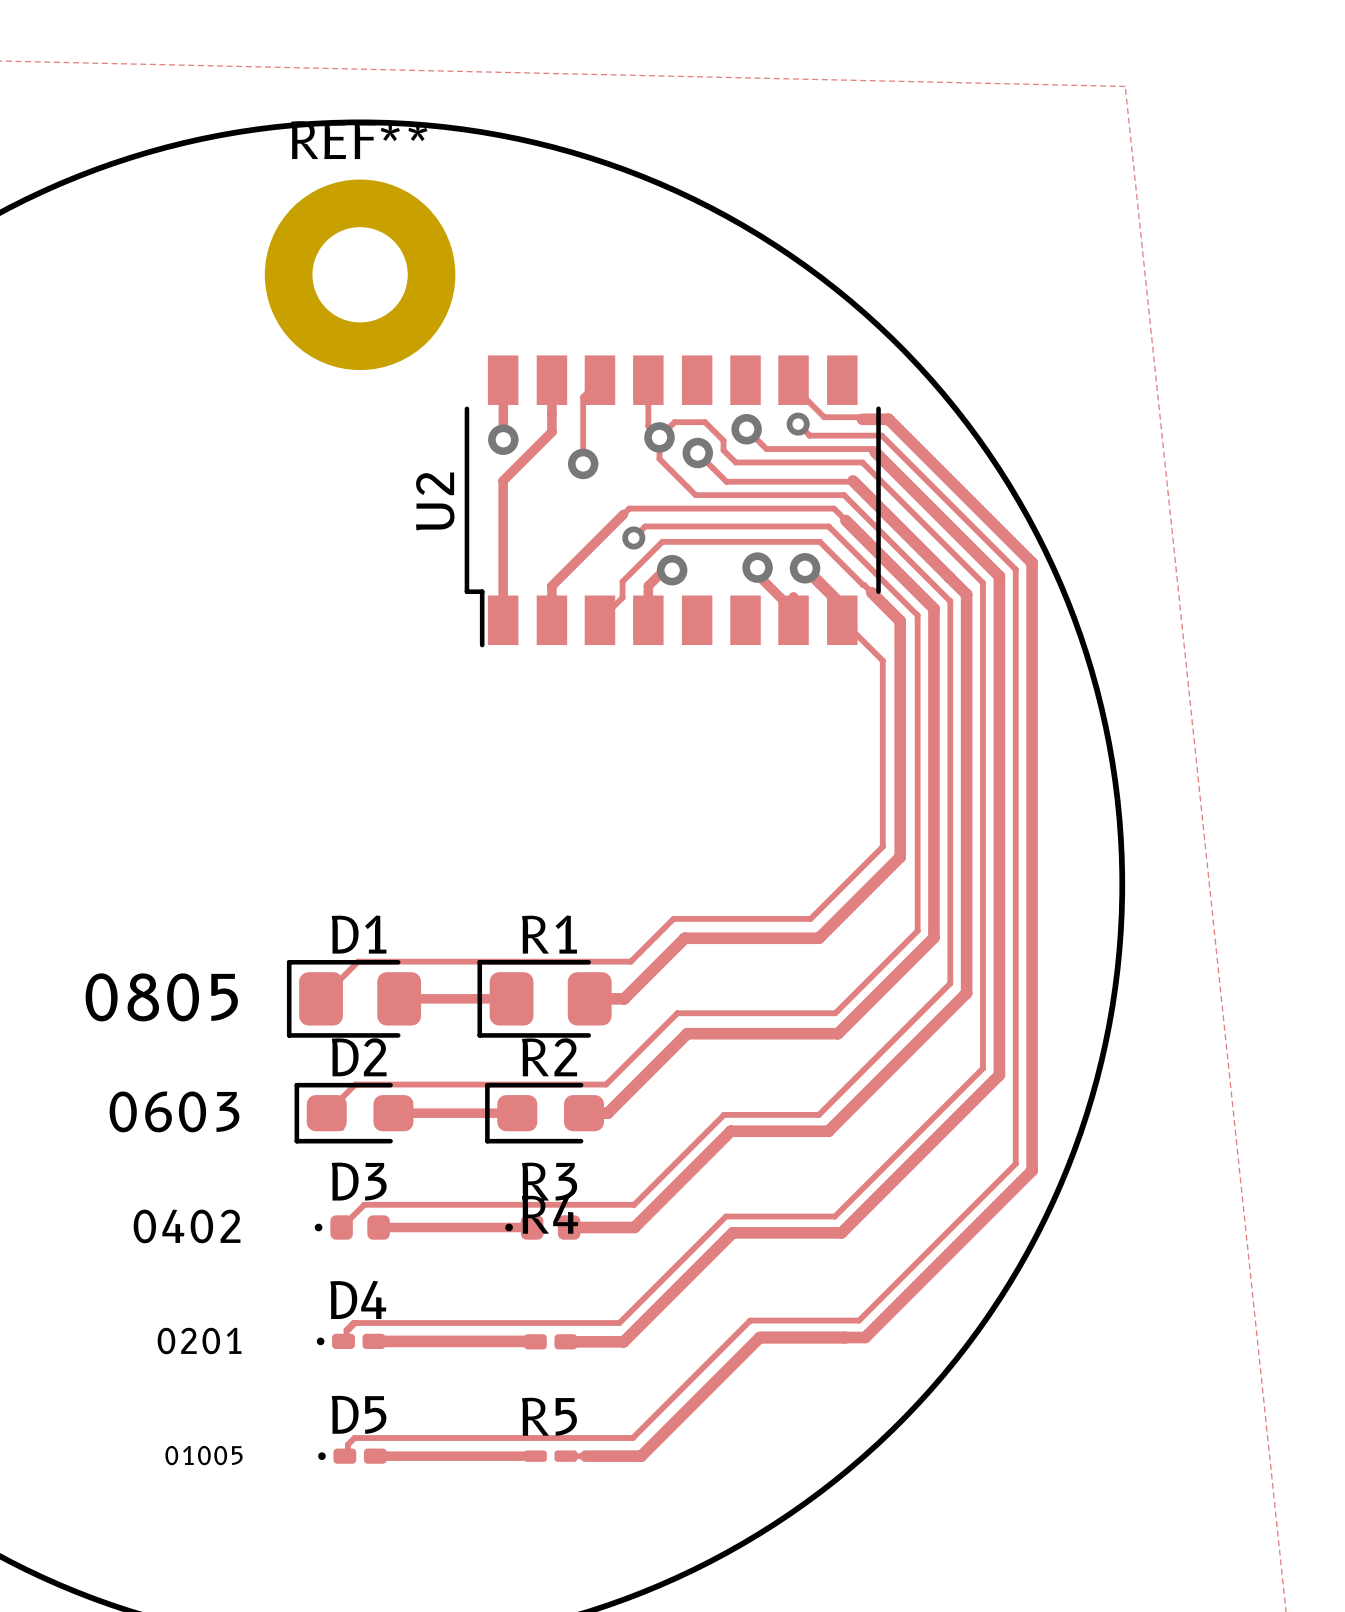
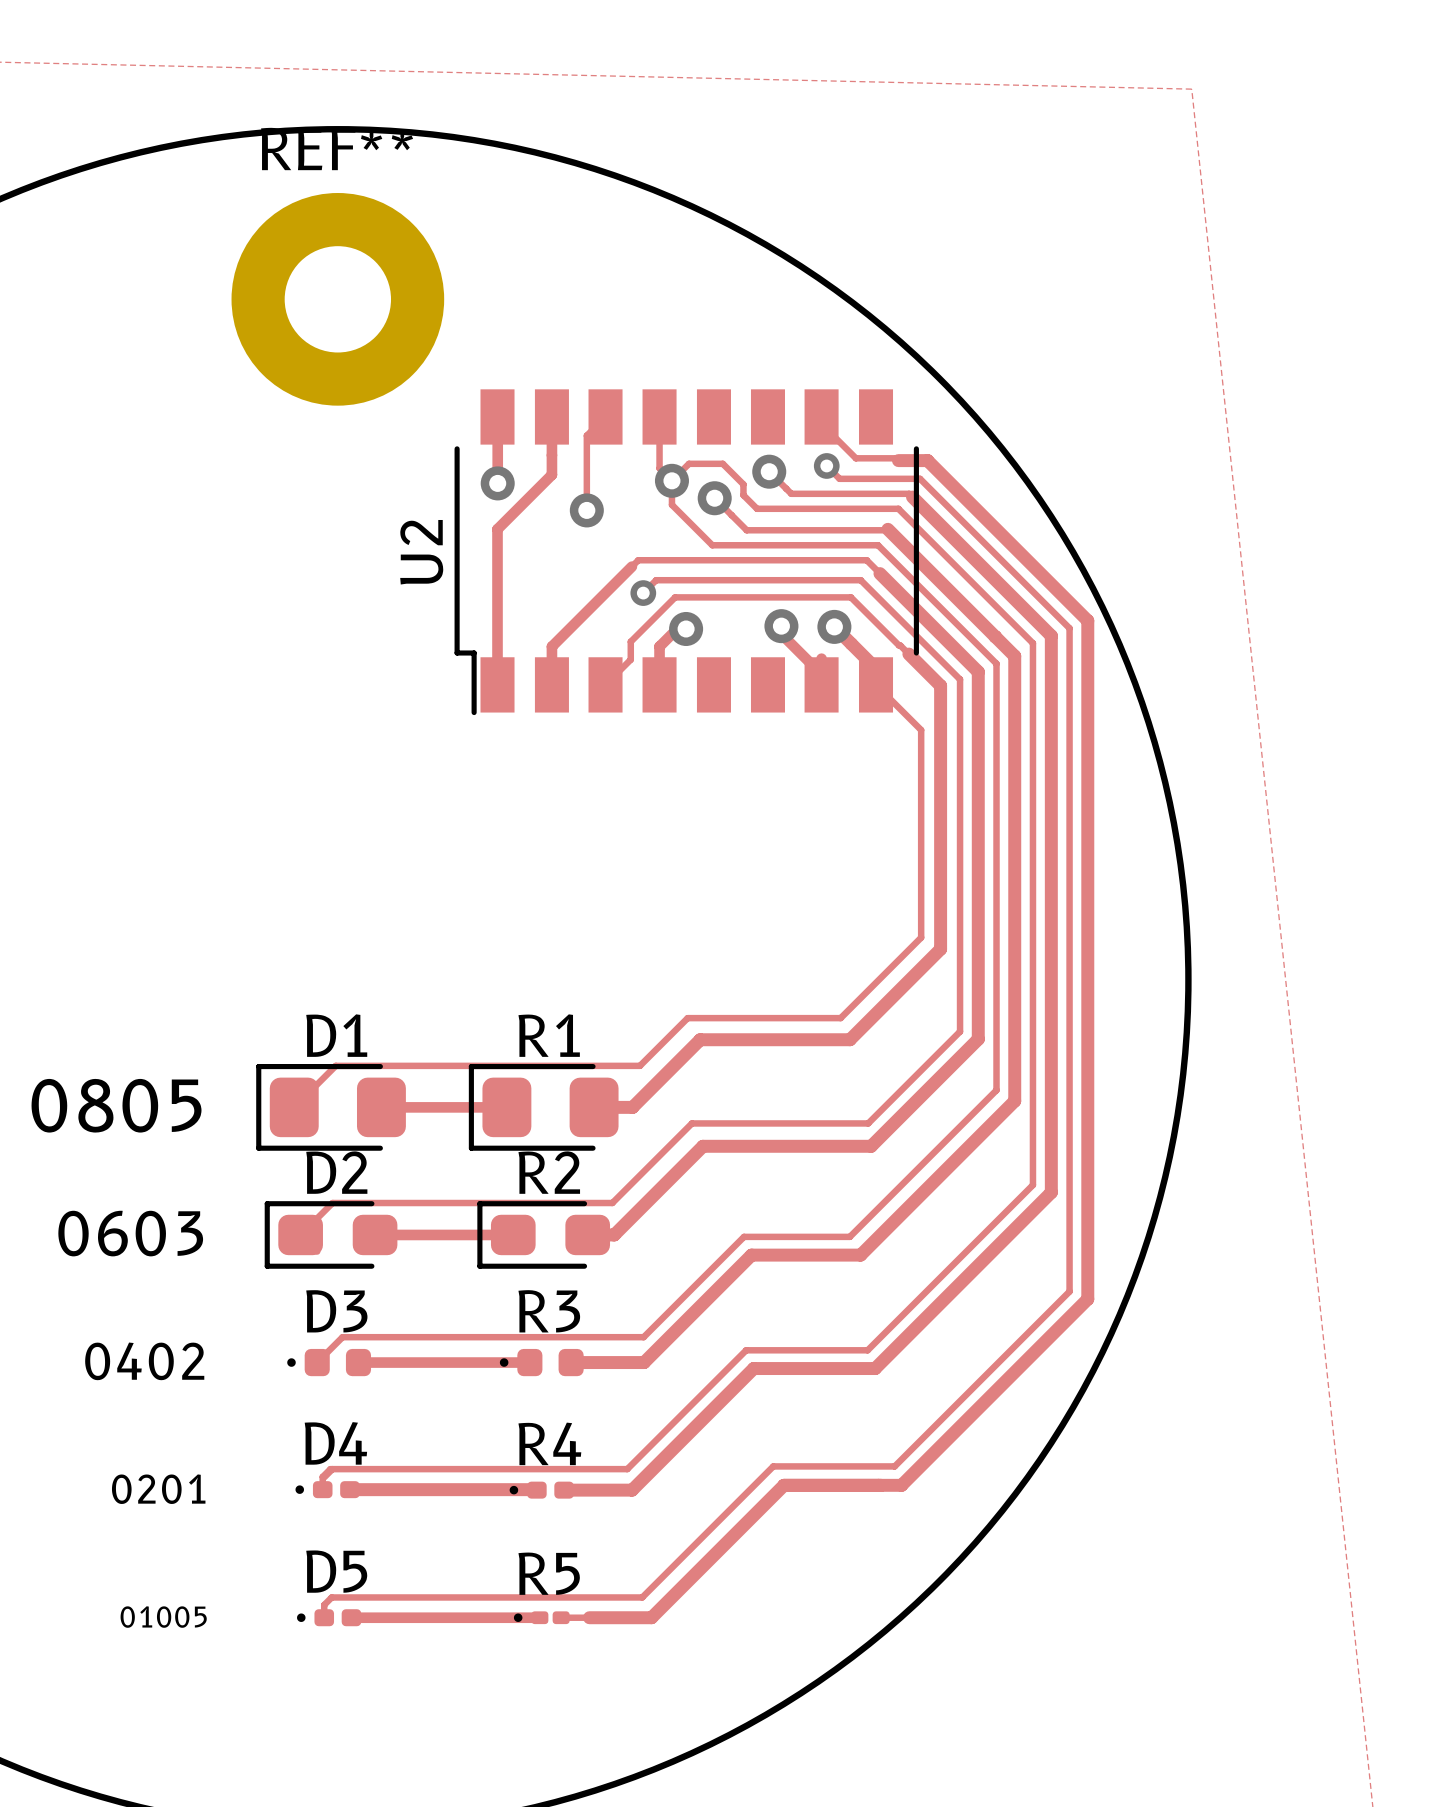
R4 name position: R4 (550, 1214) -> R4 (549, 1443)
D4 footprint: [316, 1333, 386, 1350] -> [295, 1481, 360, 1499]
R4 footprint: [523, 1334, 578, 1350] -> [509, 1481, 574, 1499]
D5 footprint: [318, 1448, 387, 1464] -> [297, 1609, 362, 1627]
R5 footprint: [523, 1450, 578, 1462] -> [513, 1611, 570, 1625]

